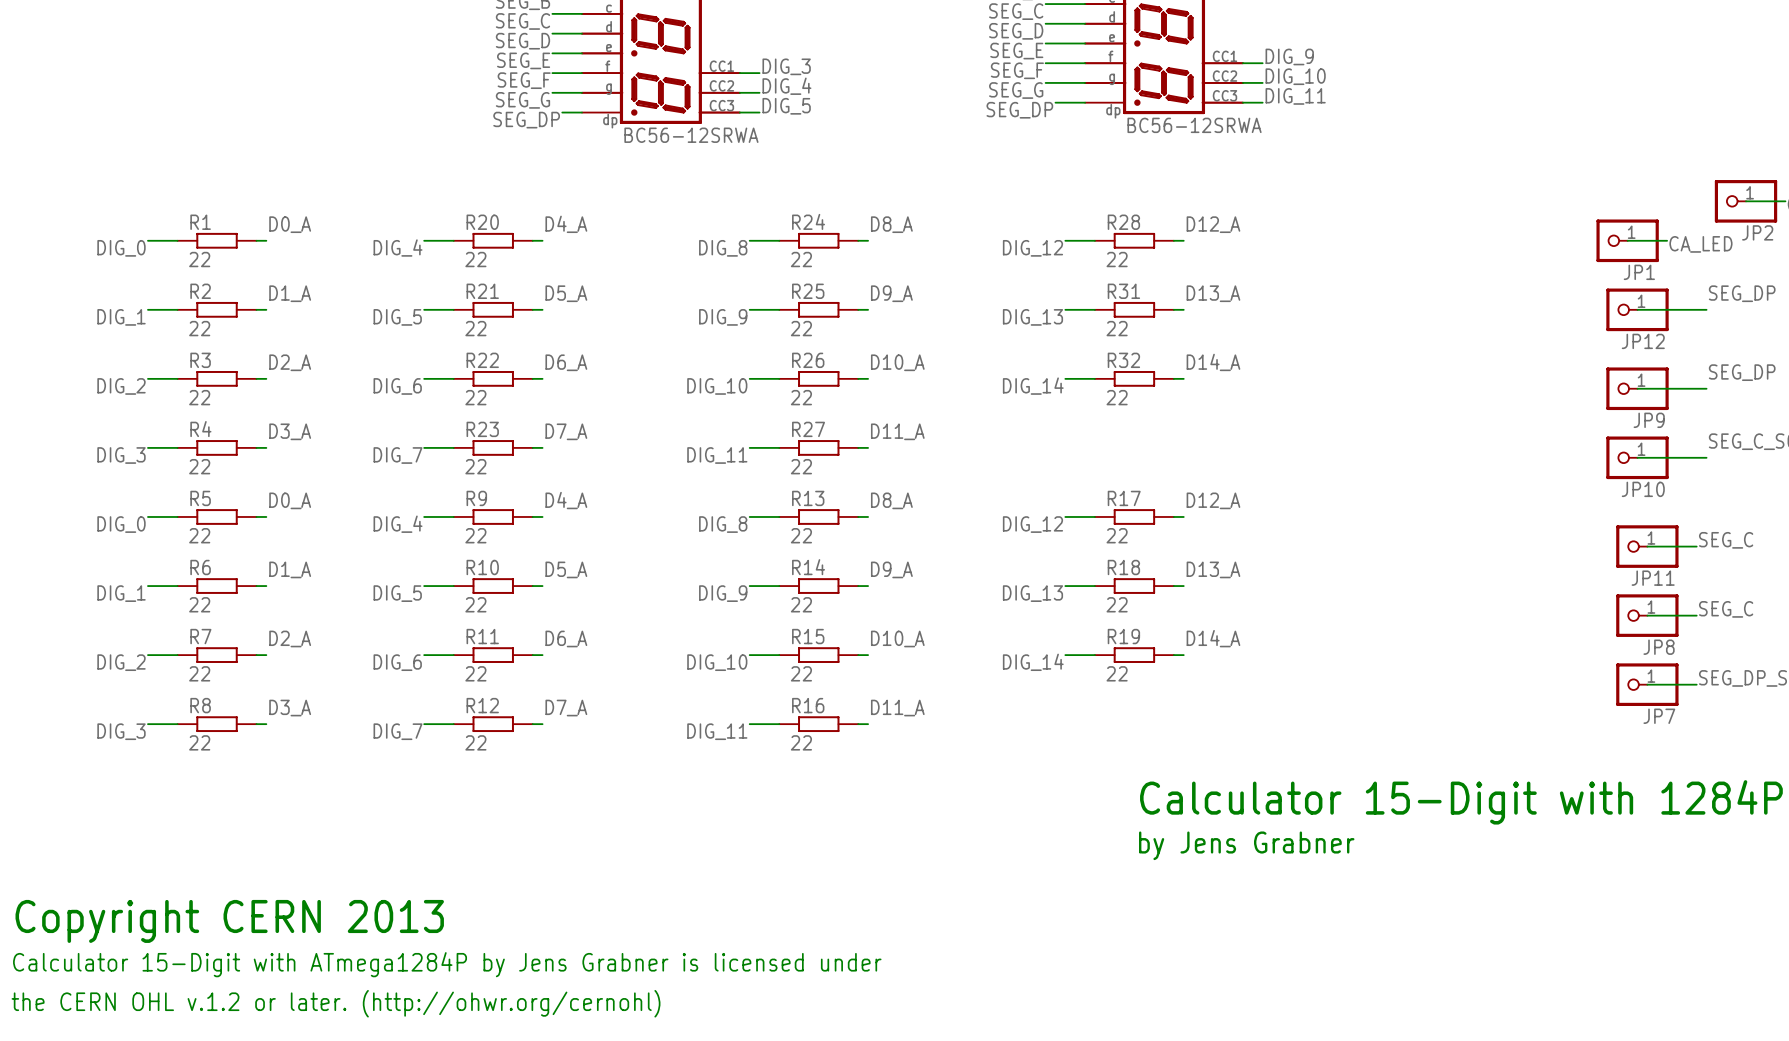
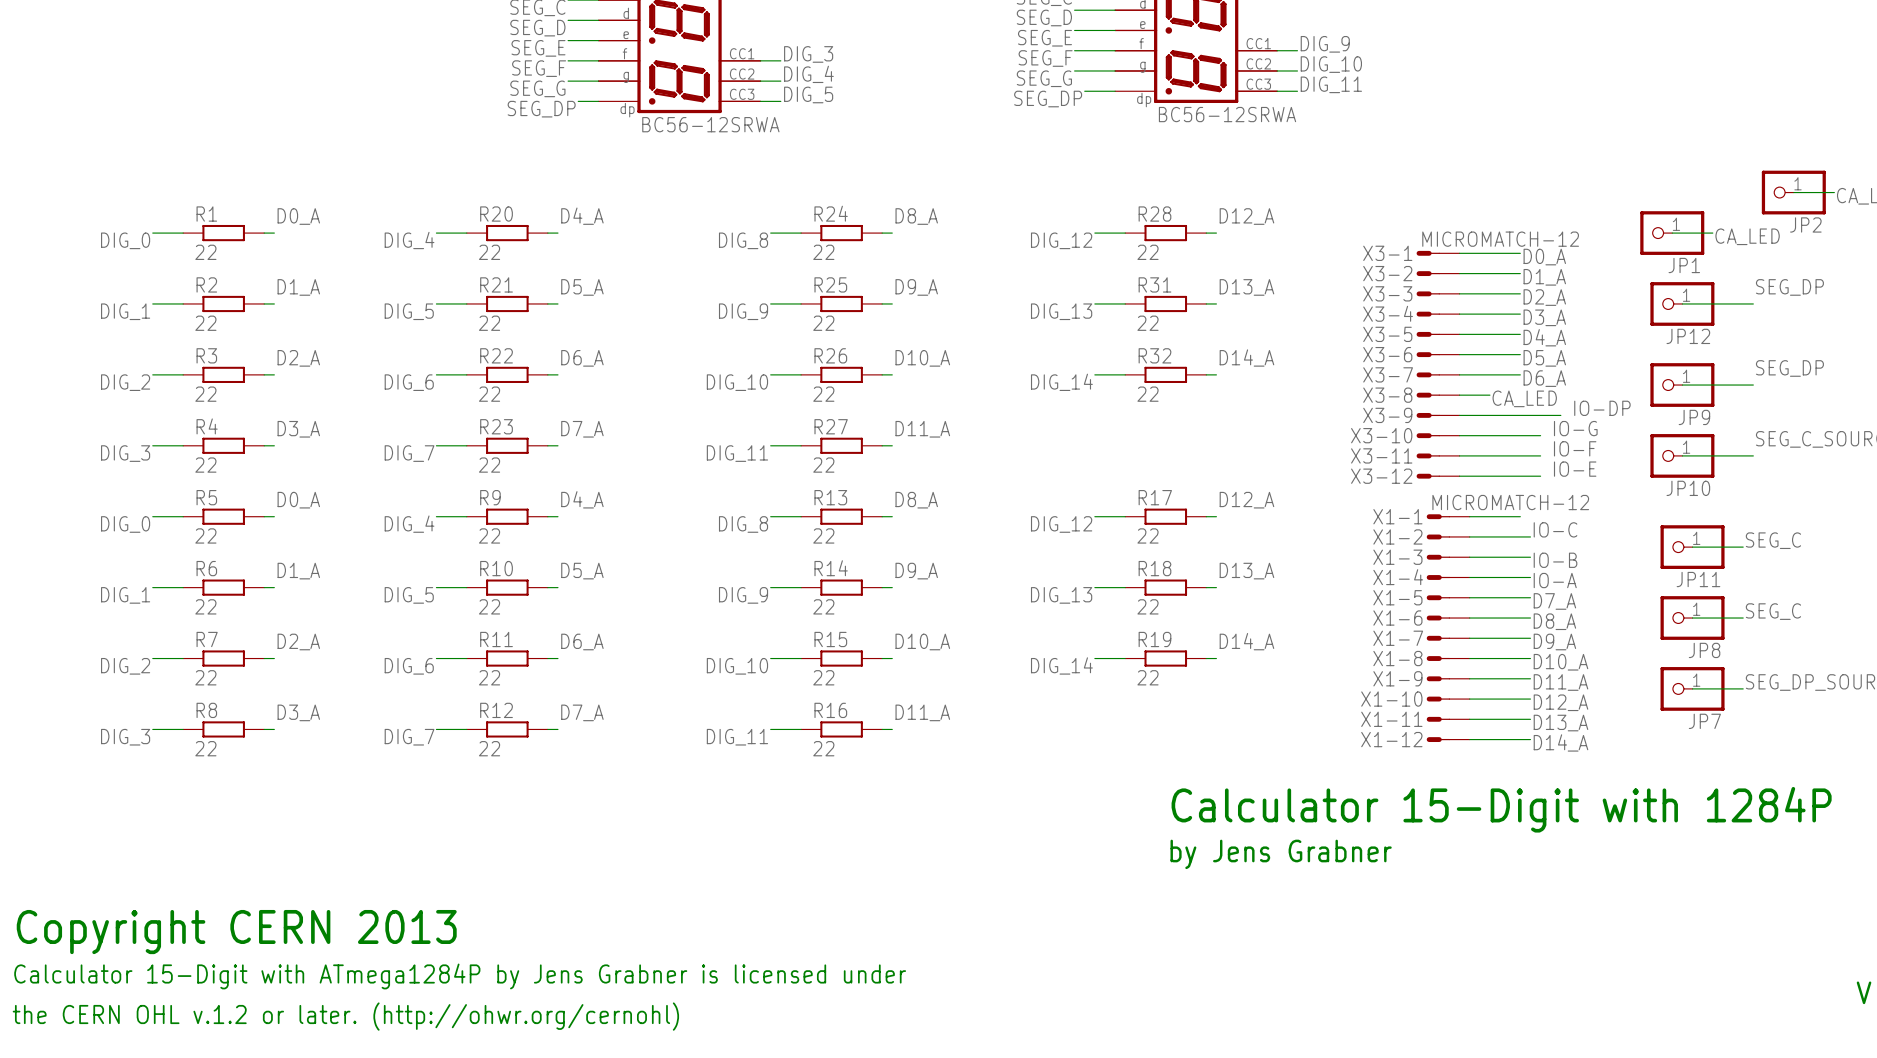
X3-1: none -> MICROMATCH-12 (1438, 253)
wire: none -> (1459, 253) (1520, 253)
label: none -> D0_A (1544, 257)
X3-2: none -> (1438, 273)
wire: none -> (1459, 273) (1520, 273)
label: none -> D1_A (1544, 277)
X3-3: none -> (1438, 293)
wire: none -> (1459, 293) (1520, 293)
label: none -> D2_A (1544, 297)
X3-4: none -> (1438, 314)
wire: none -> (1459, 314) (1520, 314)
label: none -> D3_A (1544, 317)
X3-5: none -> (1438, 334)
wire: none -> (1459, 334) (1520, 334)
label: none -> D4_A (1544, 337)
X3-6: none -> (1438, 354)
wire: none -> (1459, 354) (1520, 354)
label: none -> D5_A (1544, 358)
X3-7: none -> (1438, 374)
wire: none -> (1459, 374) (1520, 374)
label: none -> D6_A (1544, 378)
X3-8: none -> (1438, 395)
wire: none -> (1459, 395) (1489, 395)
label: none -> CA_LED (1524, 398)
label: none -> IO-DP (1602, 408)
X3-9: none -> (1438, 415)
wire: none -> (1459, 415) (1560, 415)
label: none -> IO-G (1575, 428)
X3-10: none -> (1438, 435)
wire: none -> (1459, 435) (1540, 435)
label: none -> IO-F (1575, 448)
X3-11: none -> (1438, 455)
wire: none -> (1459, 455) (1540, 455)
label: none -> IO-E (1575, 469)
X3-12: none -> (1438, 476)
wire: none -> (1459, 476) (1540, 476)
X1-1: none -> MICROMATCH-12 (1448, 516)
wire: none -> (1469, 516) (1520, 516)
label: none -> IO-C (1555, 529)
X1-2: none -> (1448, 536)
wire: none -> (1469, 536) (1530, 536)
X1-3: none -> (1448, 557)
wire: none -> (1469, 557) (1530, 557)
label: none -> IO-B (1555, 560)
X1-4: none -> (1448, 577)
wire: none -> (1469, 577) (1530, 577)
label: none -> IO-A (1555, 580)
X1-5: none -> (1448, 597)
wire: none -> (1469, 597) (1530, 597)
label: none -> D7_A (1554, 601)
X1-6: none -> (1448, 618)
wire: none -> (1469, 618) (1530, 618)
label: none -> D8_A (1554, 621)
X1-7: none -> (1448, 638)
wire: none -> (1469, 638) (1530, 638)
label: none -> D9_A (1554, 641)
X1-8: none -> (1448, 658)
wire: none -> (1469, 658) (1530, 658)
label: none -> D10_A (1560, 662)
X1-9: none -> (1448, 678)
wire: none -> (1469, 678) (1530, 678)
label: none -> D11_A (1560, 682)
X1-10: none -> (1448, 699)
wire: none -> (1469, 699) (1530, 699)
label: none -> D12_A (1560, 702)
X1-11: none -> (1448, 719)
wire: none -> (1469, 719) (1530, 719)
label: none -> D13_A (1560, 723)
X1-12: none -> (1448, 739)
wire: none -> (1469, 739) (1530, 739)
label: none -> D14_A (1560, 742)

